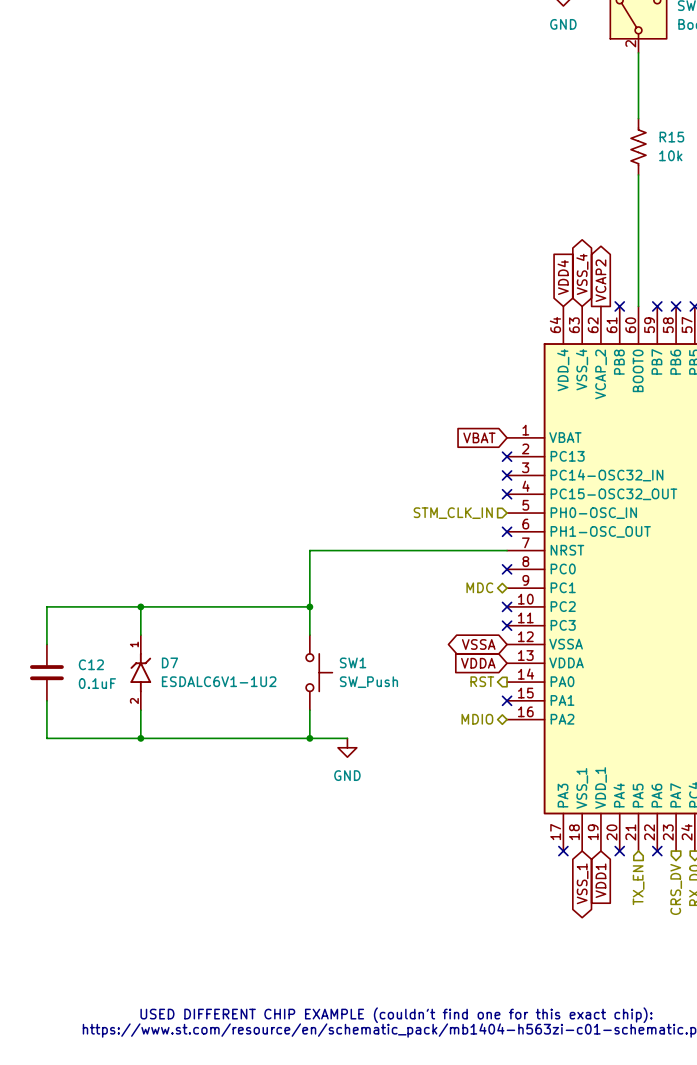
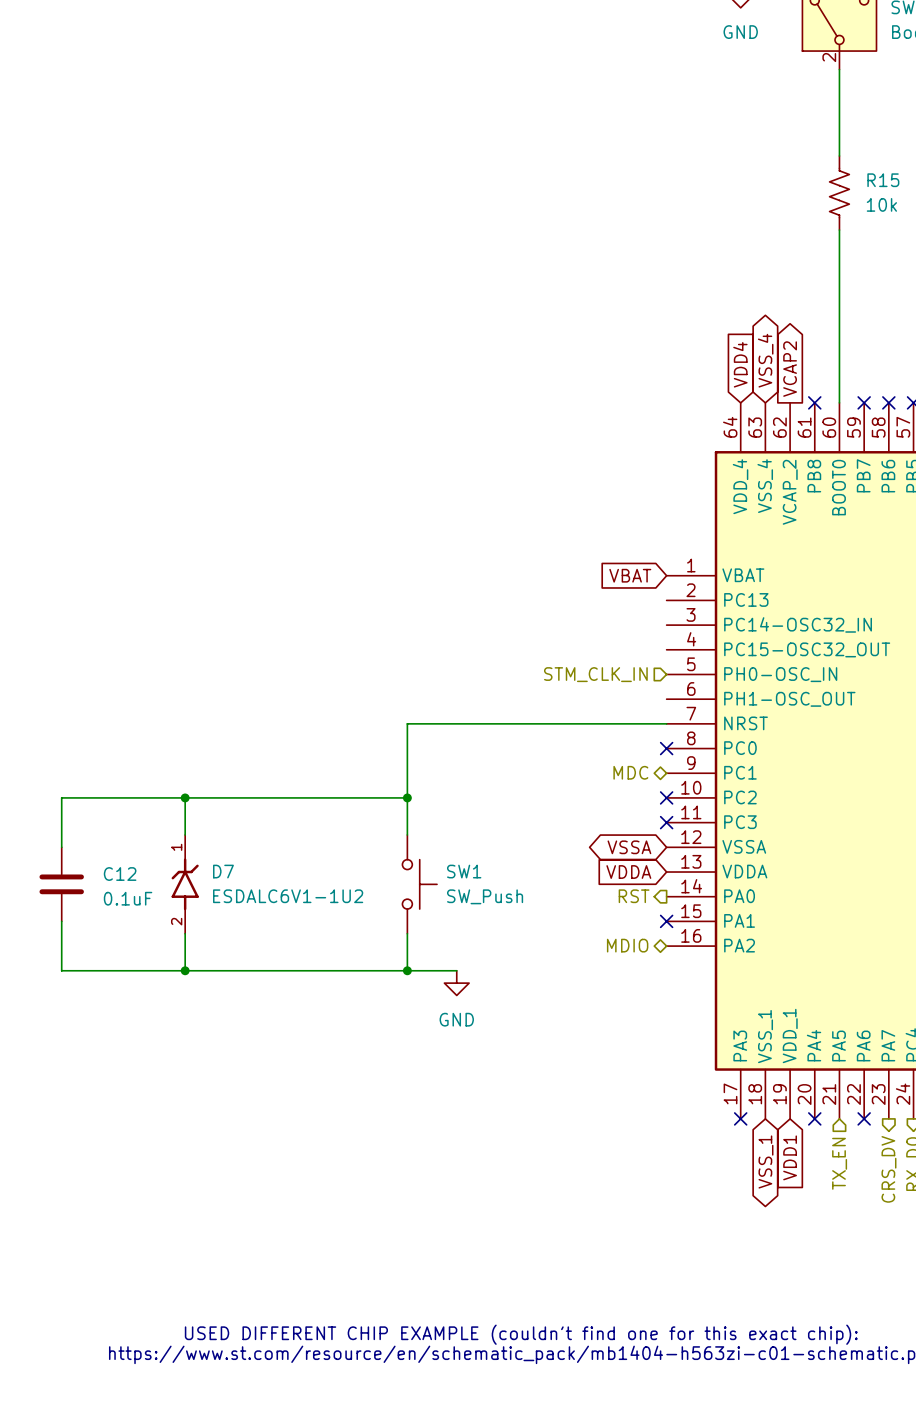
no-connect mark: (507, 456) -> none
no-connect mark: (507, 475) -> none
no-connect mark: (507, 494) -> none
no-connect mark: (507, 531) -> none

